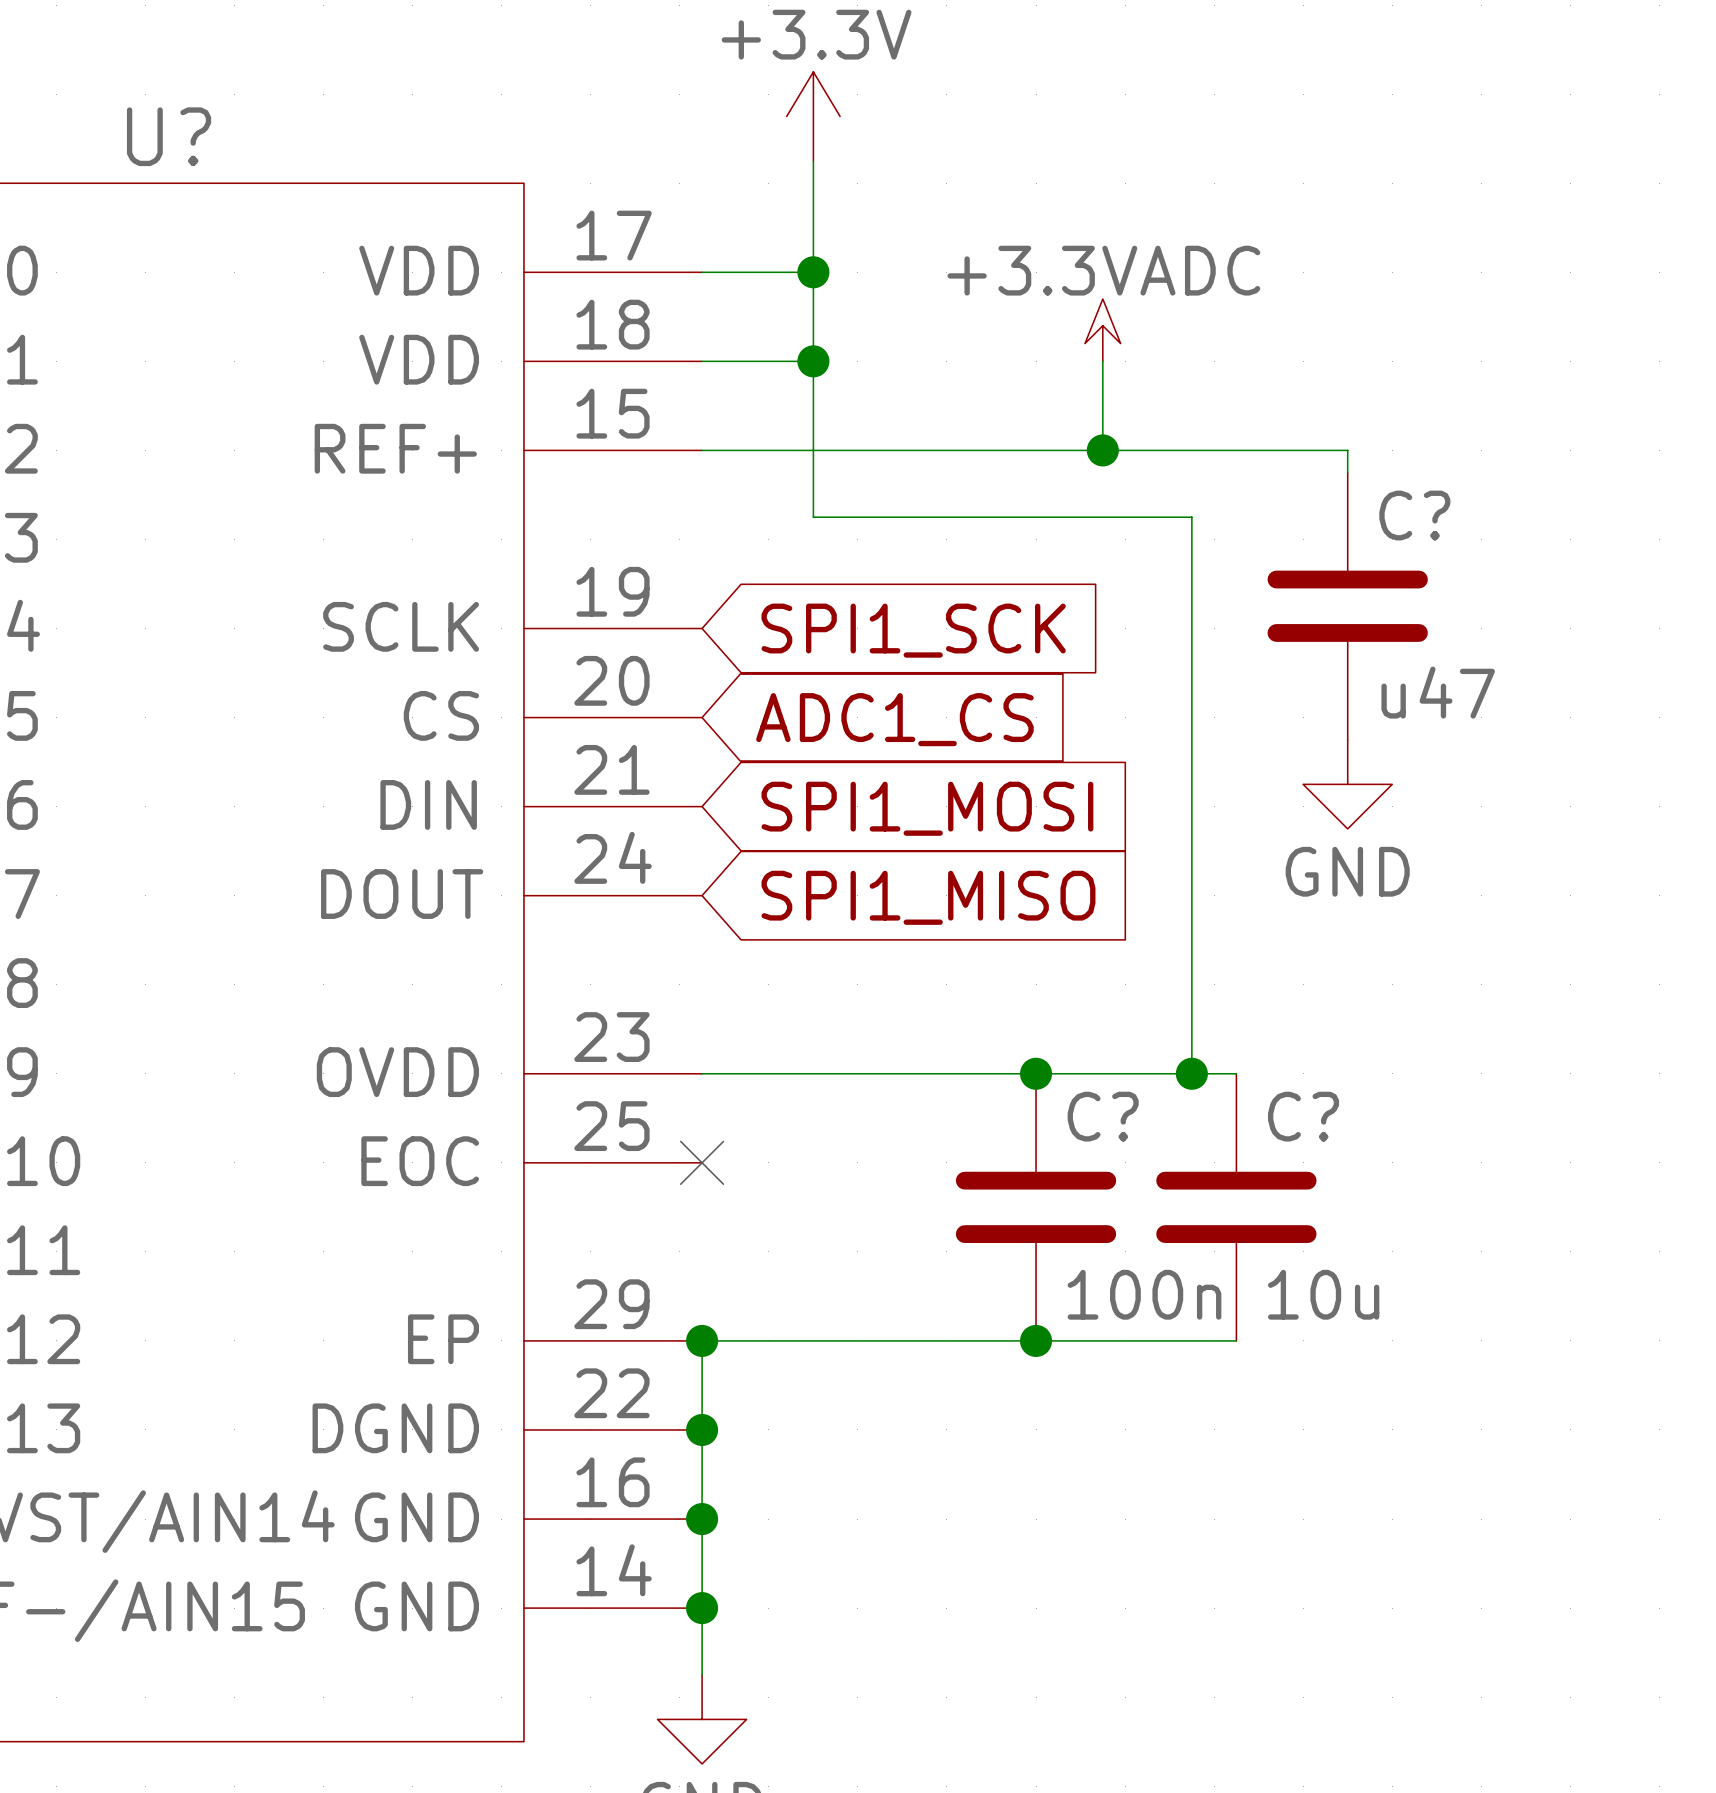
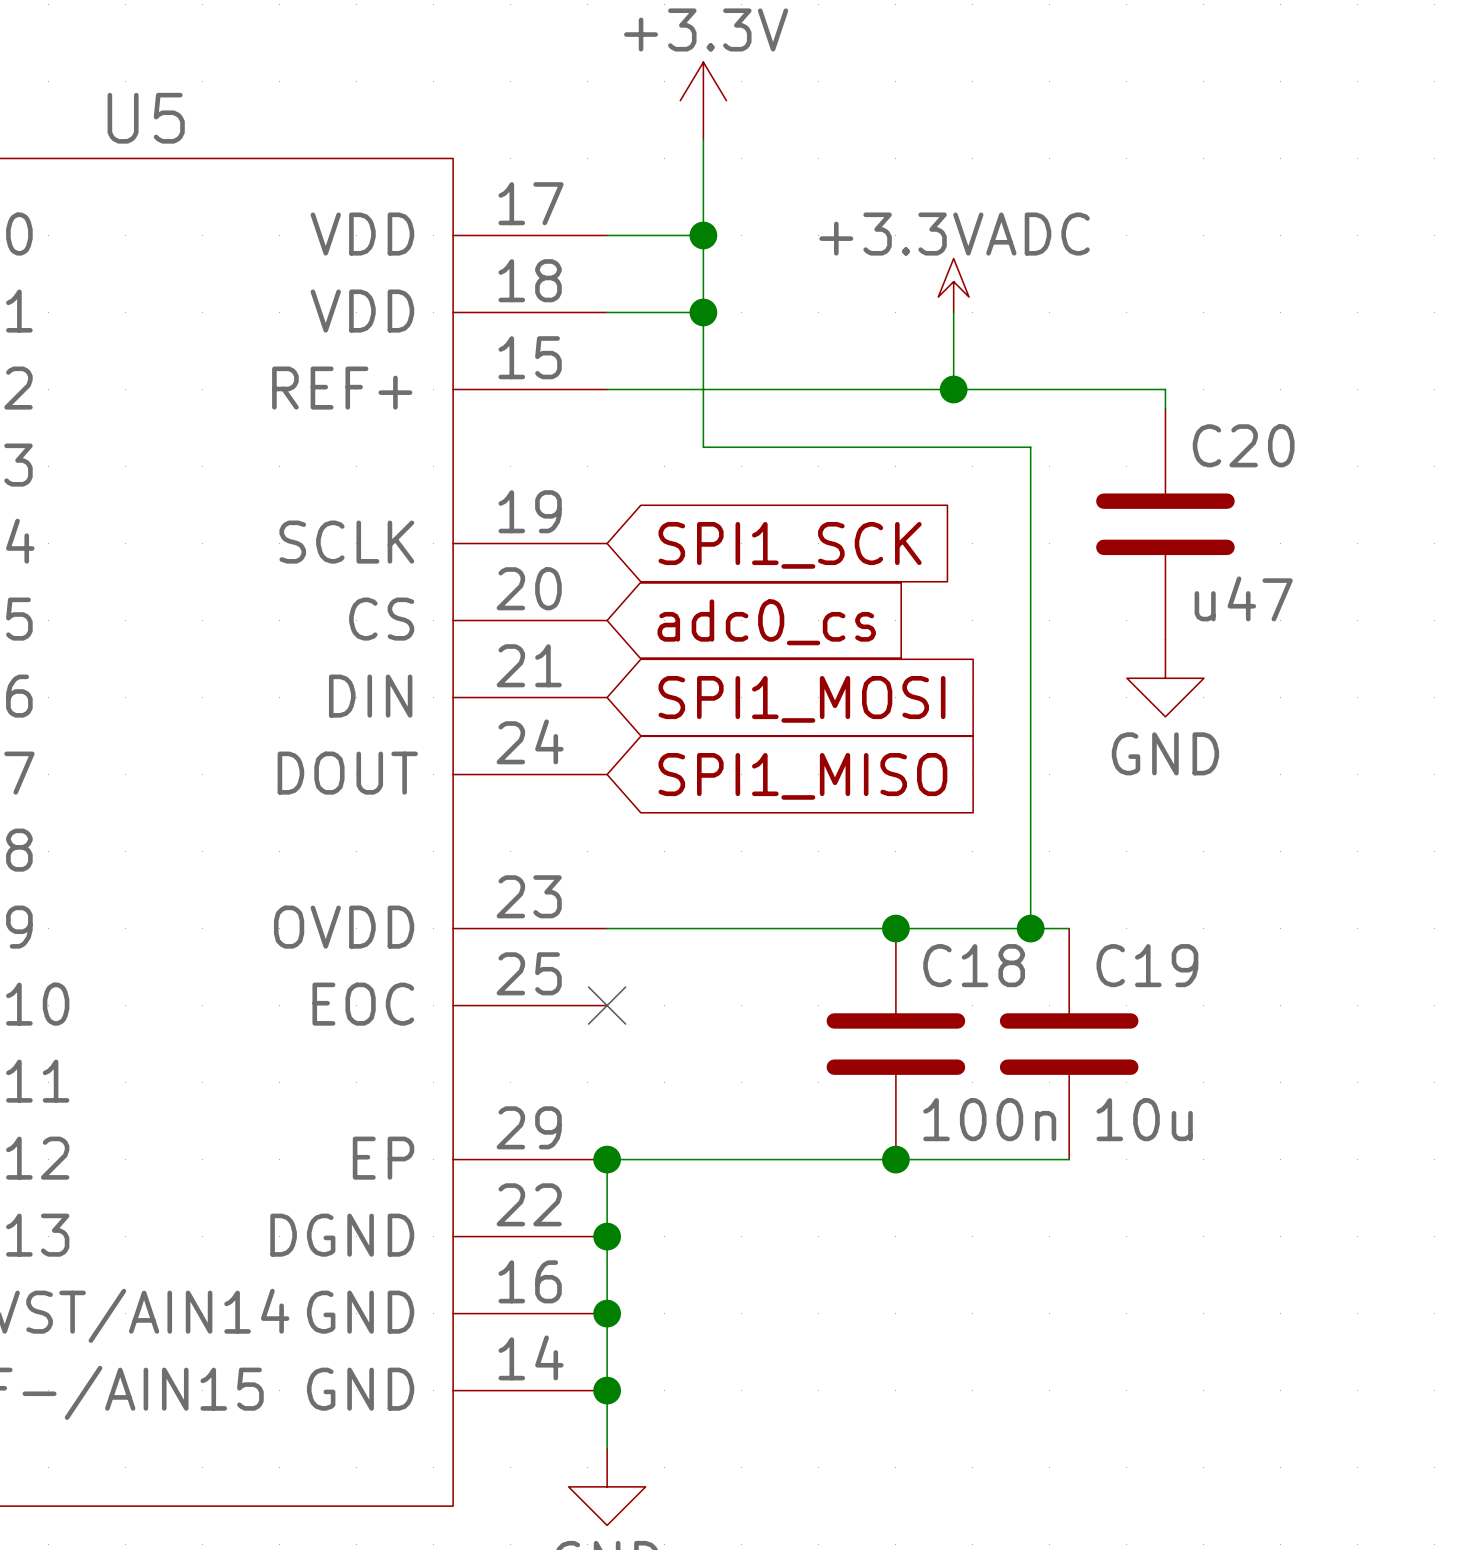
U? name: U? (169, 136) -> U5 (146, 118)
C? name: C? (1414, 515) -> C20 (1243, 445)
global label: ADC1_CS (894, 719) -> adc0_cs (766, 622)
C? name: C? (1103, 1116) -> C18 (974, 965)
C? name: C? (1303, 1116) -> C19 (1147, 965)

